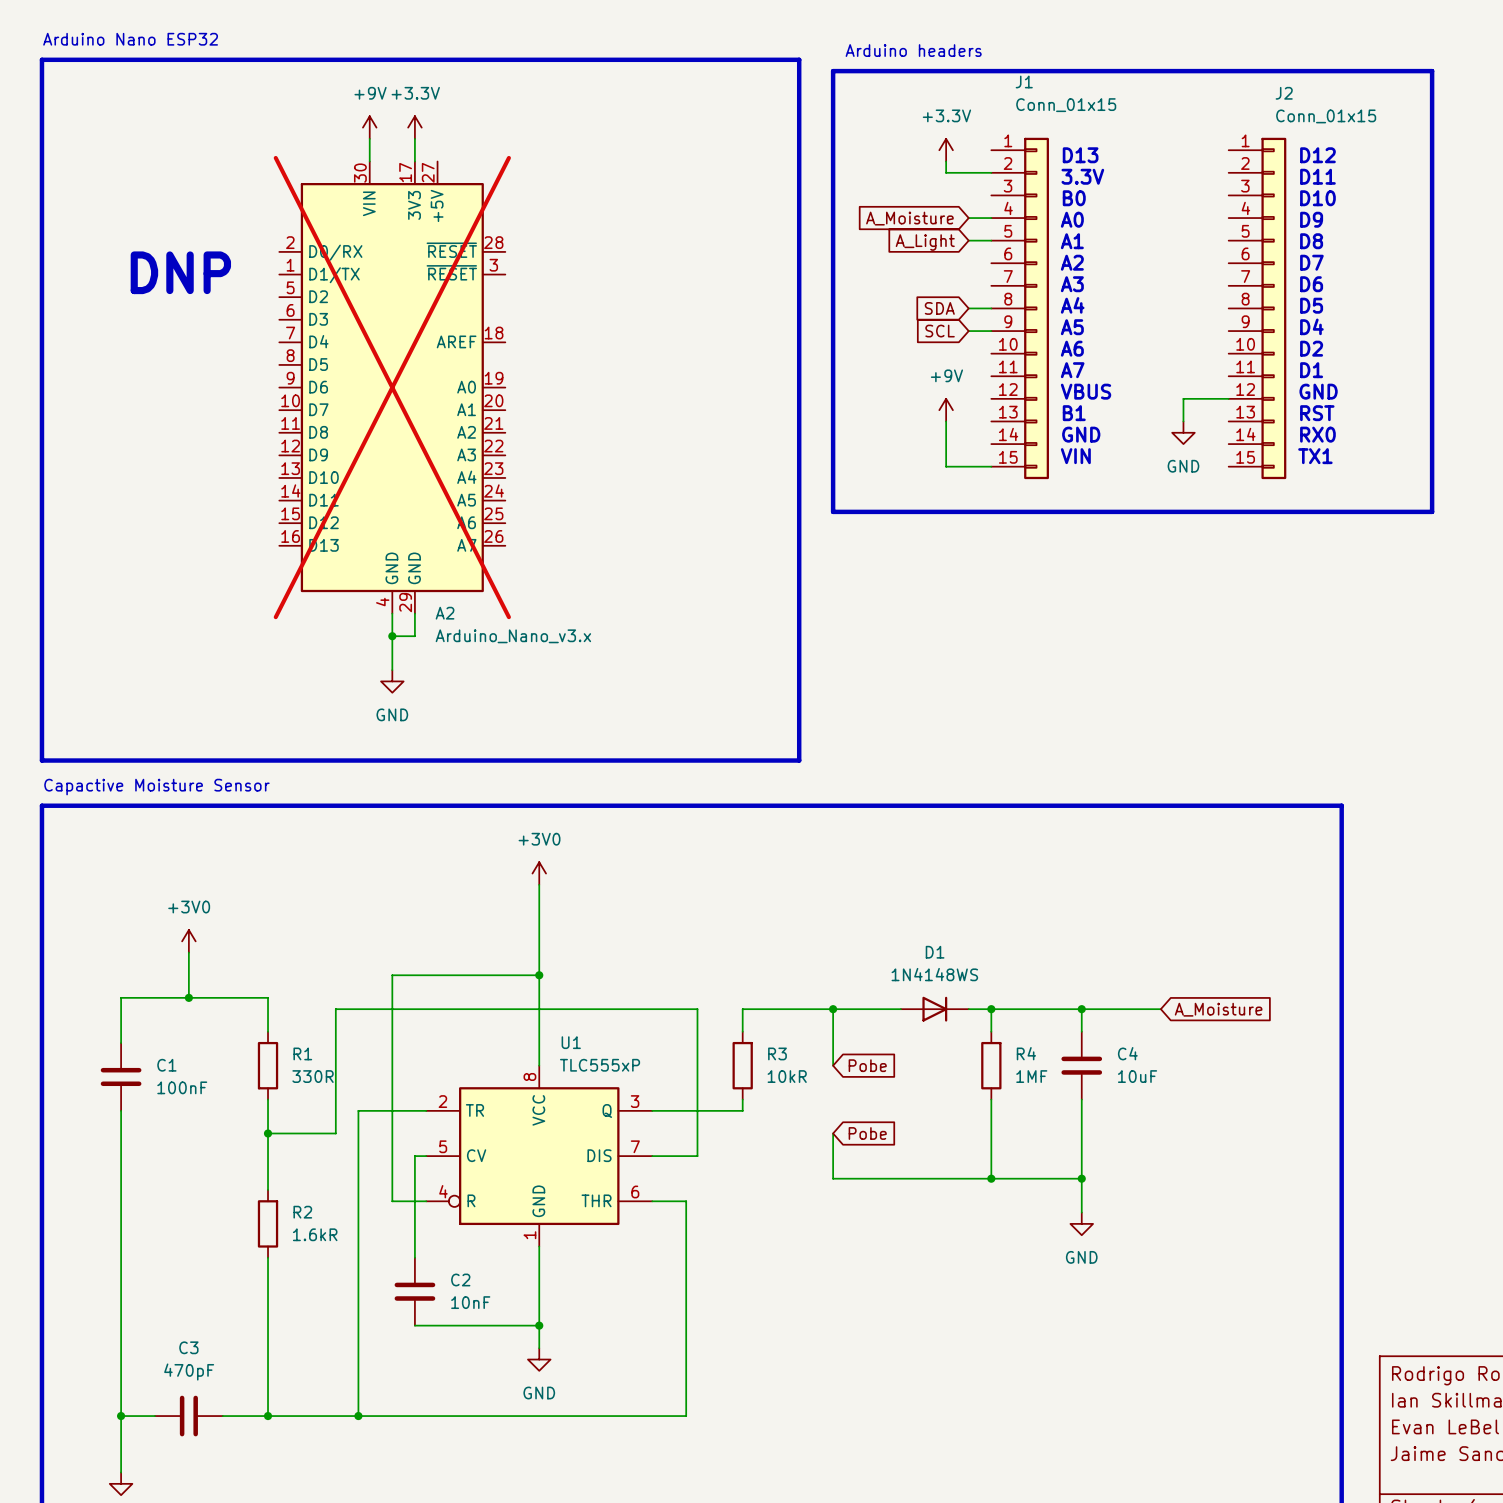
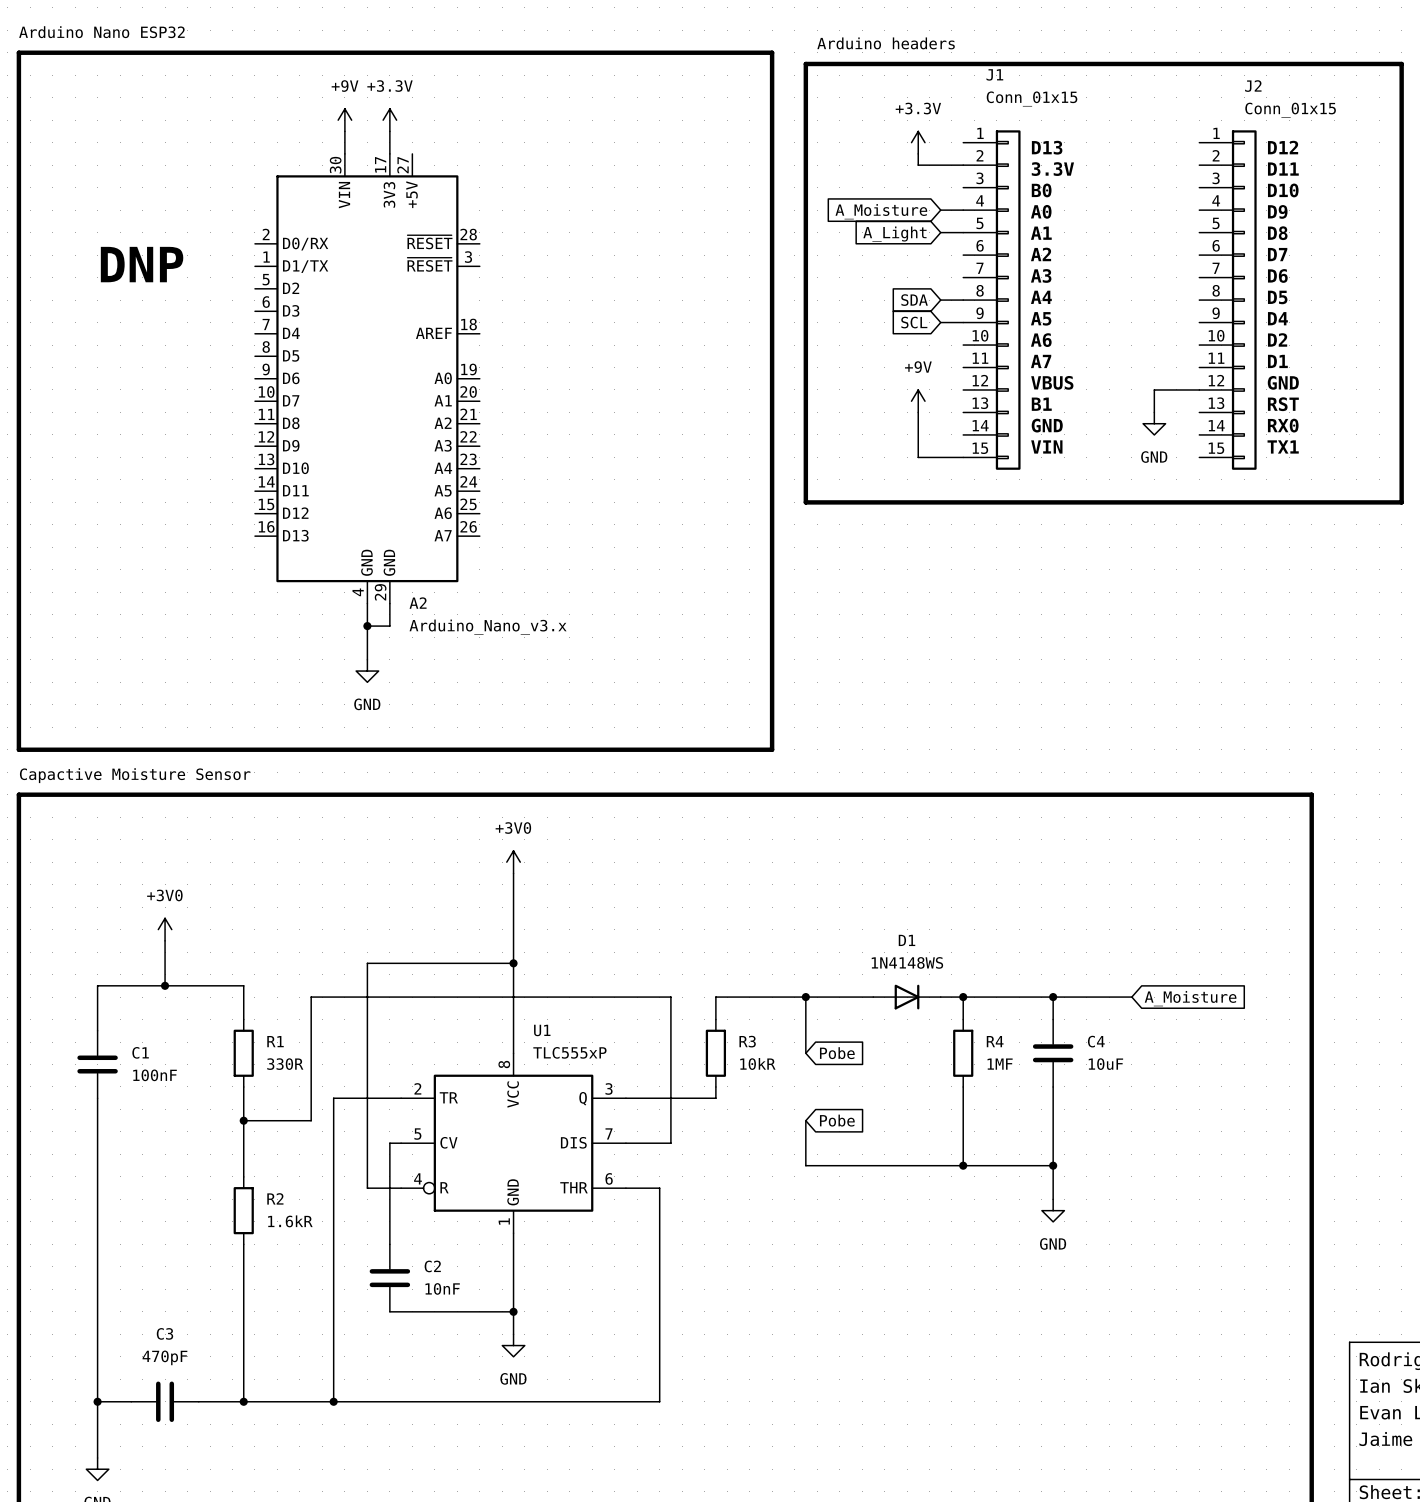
A2 do-not-place cross: (392, 387) -> none

